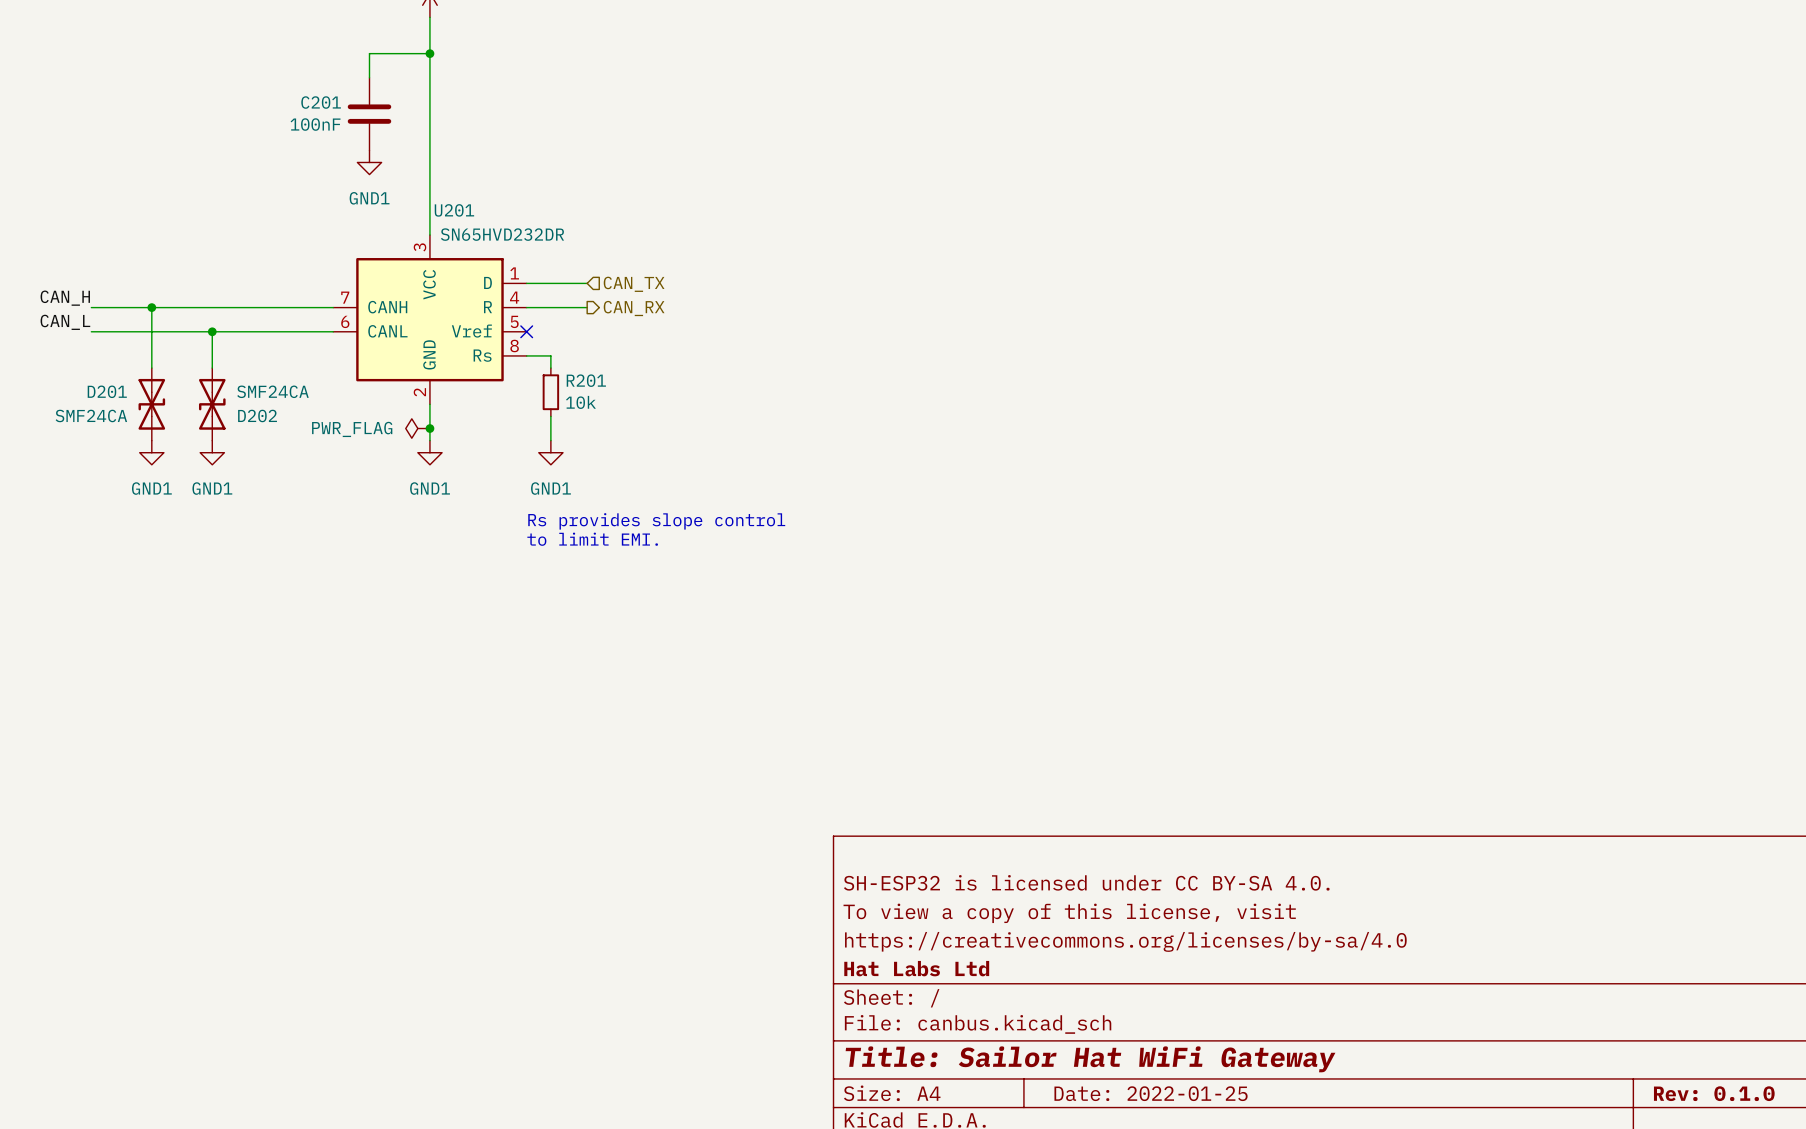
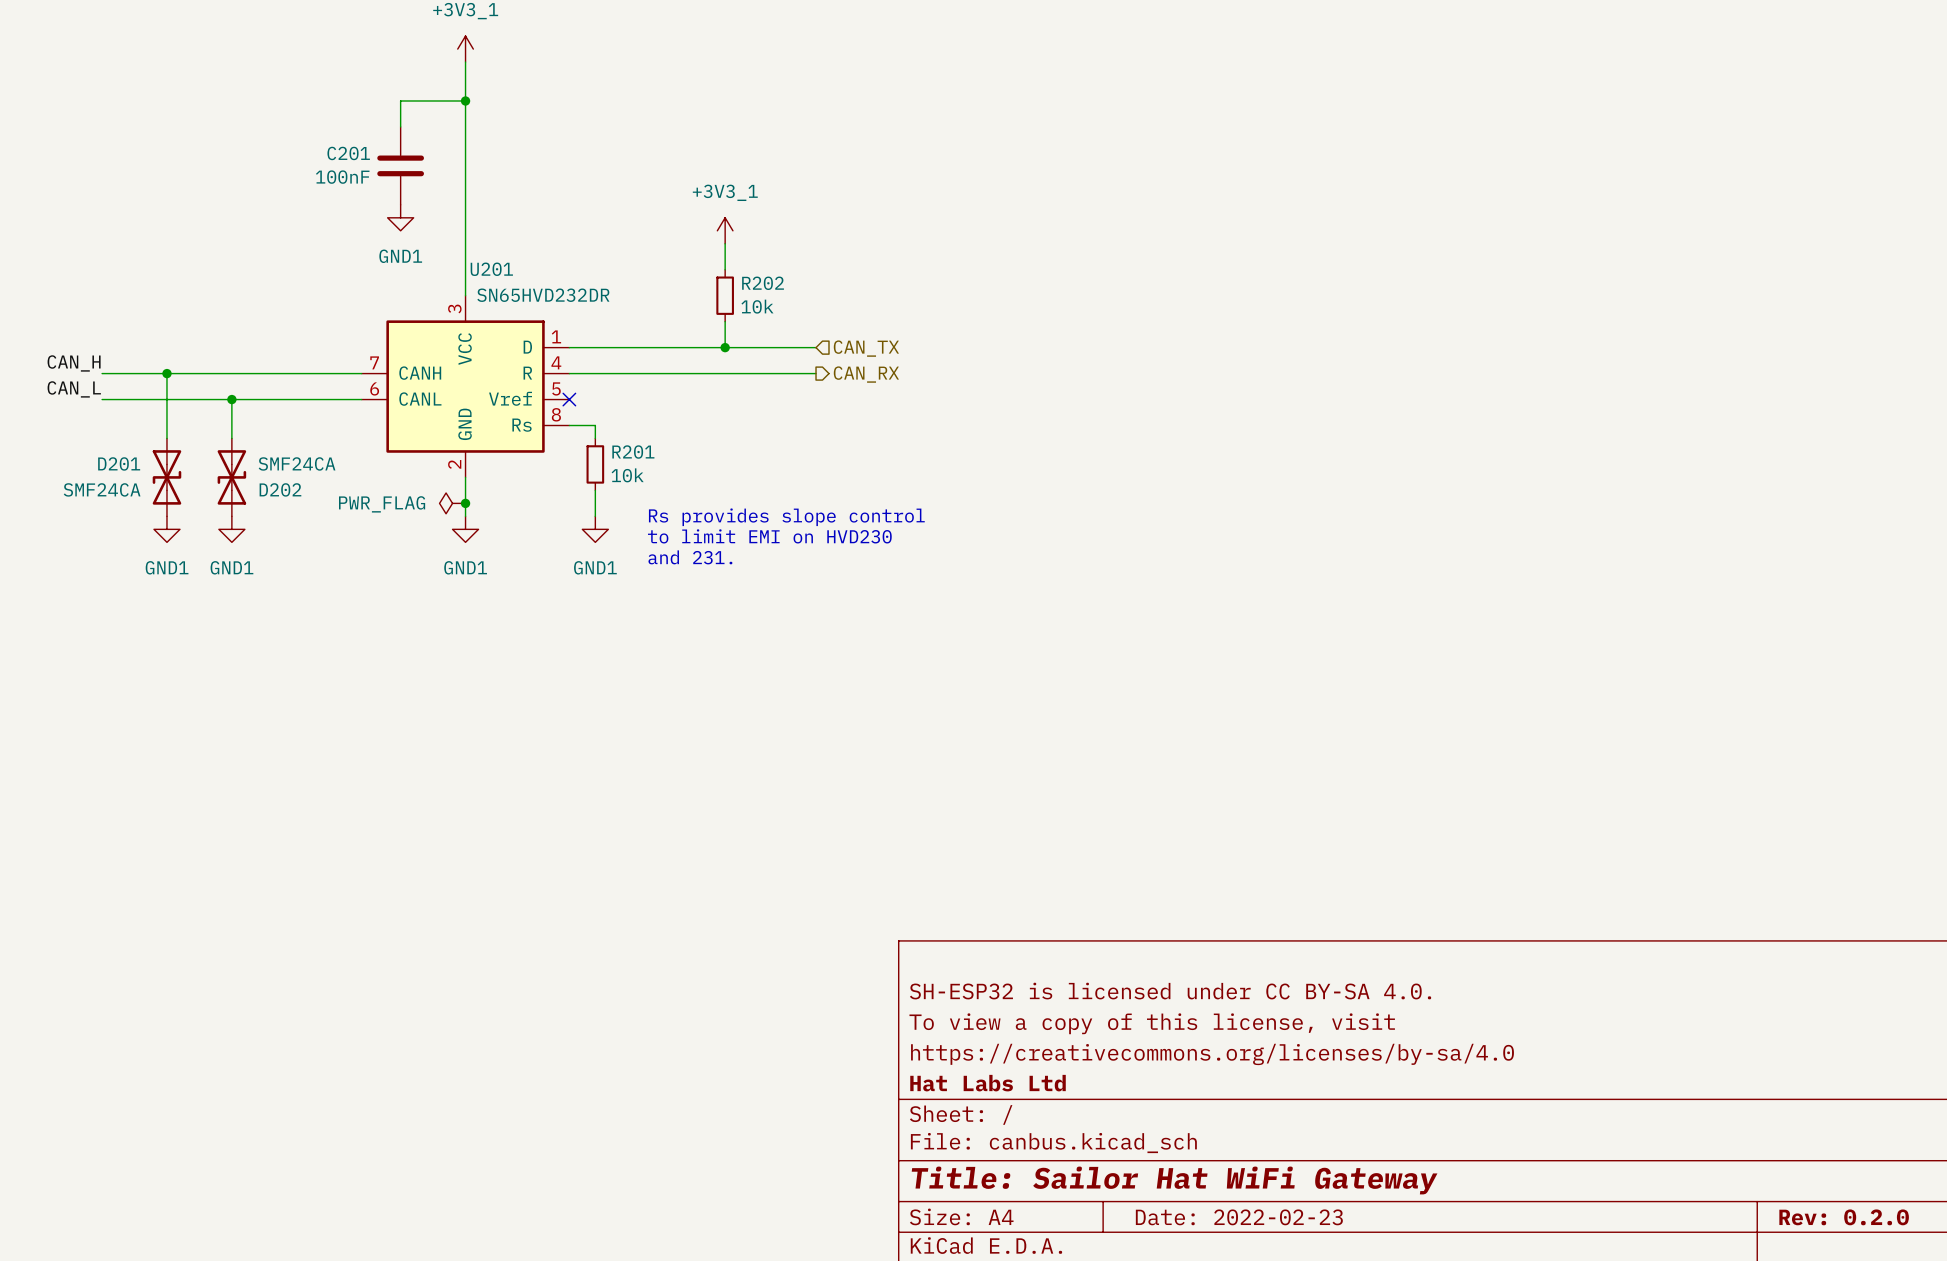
power symbol: none -> +3V3_1 (725, 230)
wire: none -> (725, 243) (725, 269)
R202: none -> 10k (725, 295)
wire: none -> (725, 321) (725, 347)
wire: none -> (634, 347) (816, 347)
junction: none -> (725, 347)
hierarchical label position: CAN_TX (634, 284) -> CAN_TX (866, 348)
wire: none -> (634, 373) (816, 373)
hierarchical label position: CAN_RX (634, 308) -> CAN_RX (866, 374)
text: none -> to limit EMI on HVD230 (769, 536)
text: none -> and 231. (690, 557)
text position: Rs provides slope control (656, 521) -> Rs provides slope control (786, 517)
text: to limit EMI. (592, 539) -> none
title block: Date: 2022-01-25 (1151, 1093) -> Date: 2022-02-23 (1239, 1217)
title block: Rev: 0.1.0 (1714, 1093) -> Rev: 0.2.0 (1844, 1217)

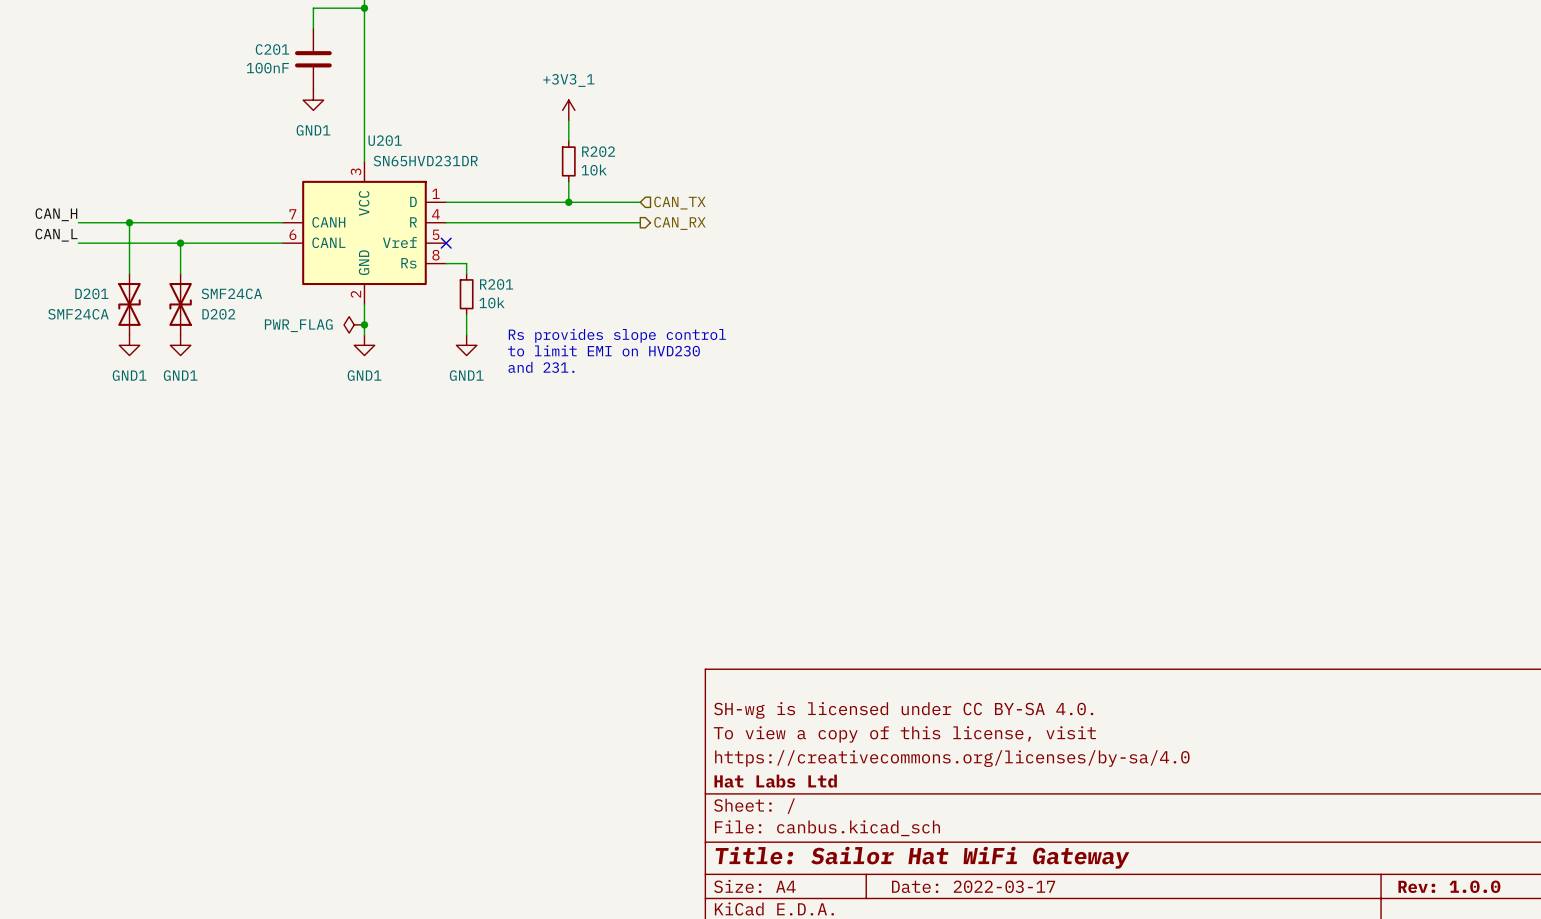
U201 value: SN65HVD232DR (543, 295) -> SN65HVD231DR (425, 161)
title block: SH-ESP32 is licensed under CC BY-SA 4.0. (1170, 991) -> SH-wg is licensed under CC BY-SA 4.0. (903, 710)
title block: Date: 2022-02-23 (1239, 1217) -> Date: 2022-03-17 (973, 886)
title block: Rev: 0.2.0 (1844, 1217) -> Rev: 1.0.0 (1449, 886)

